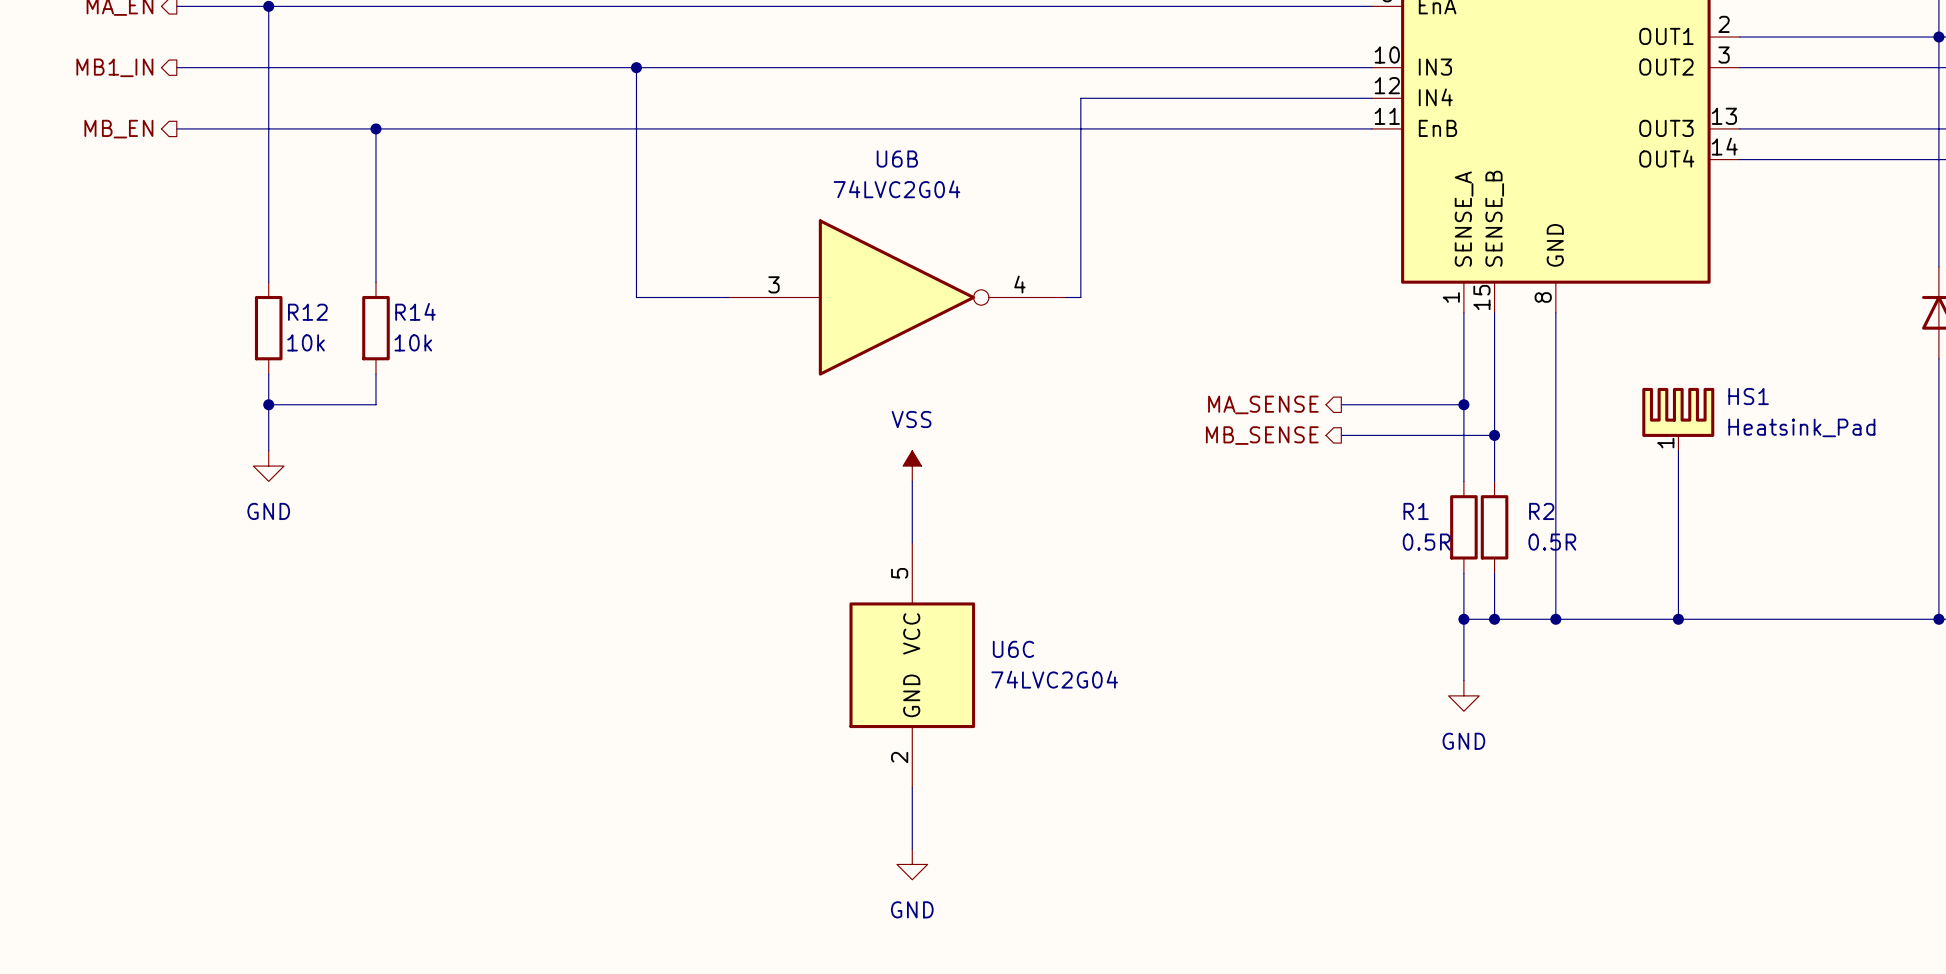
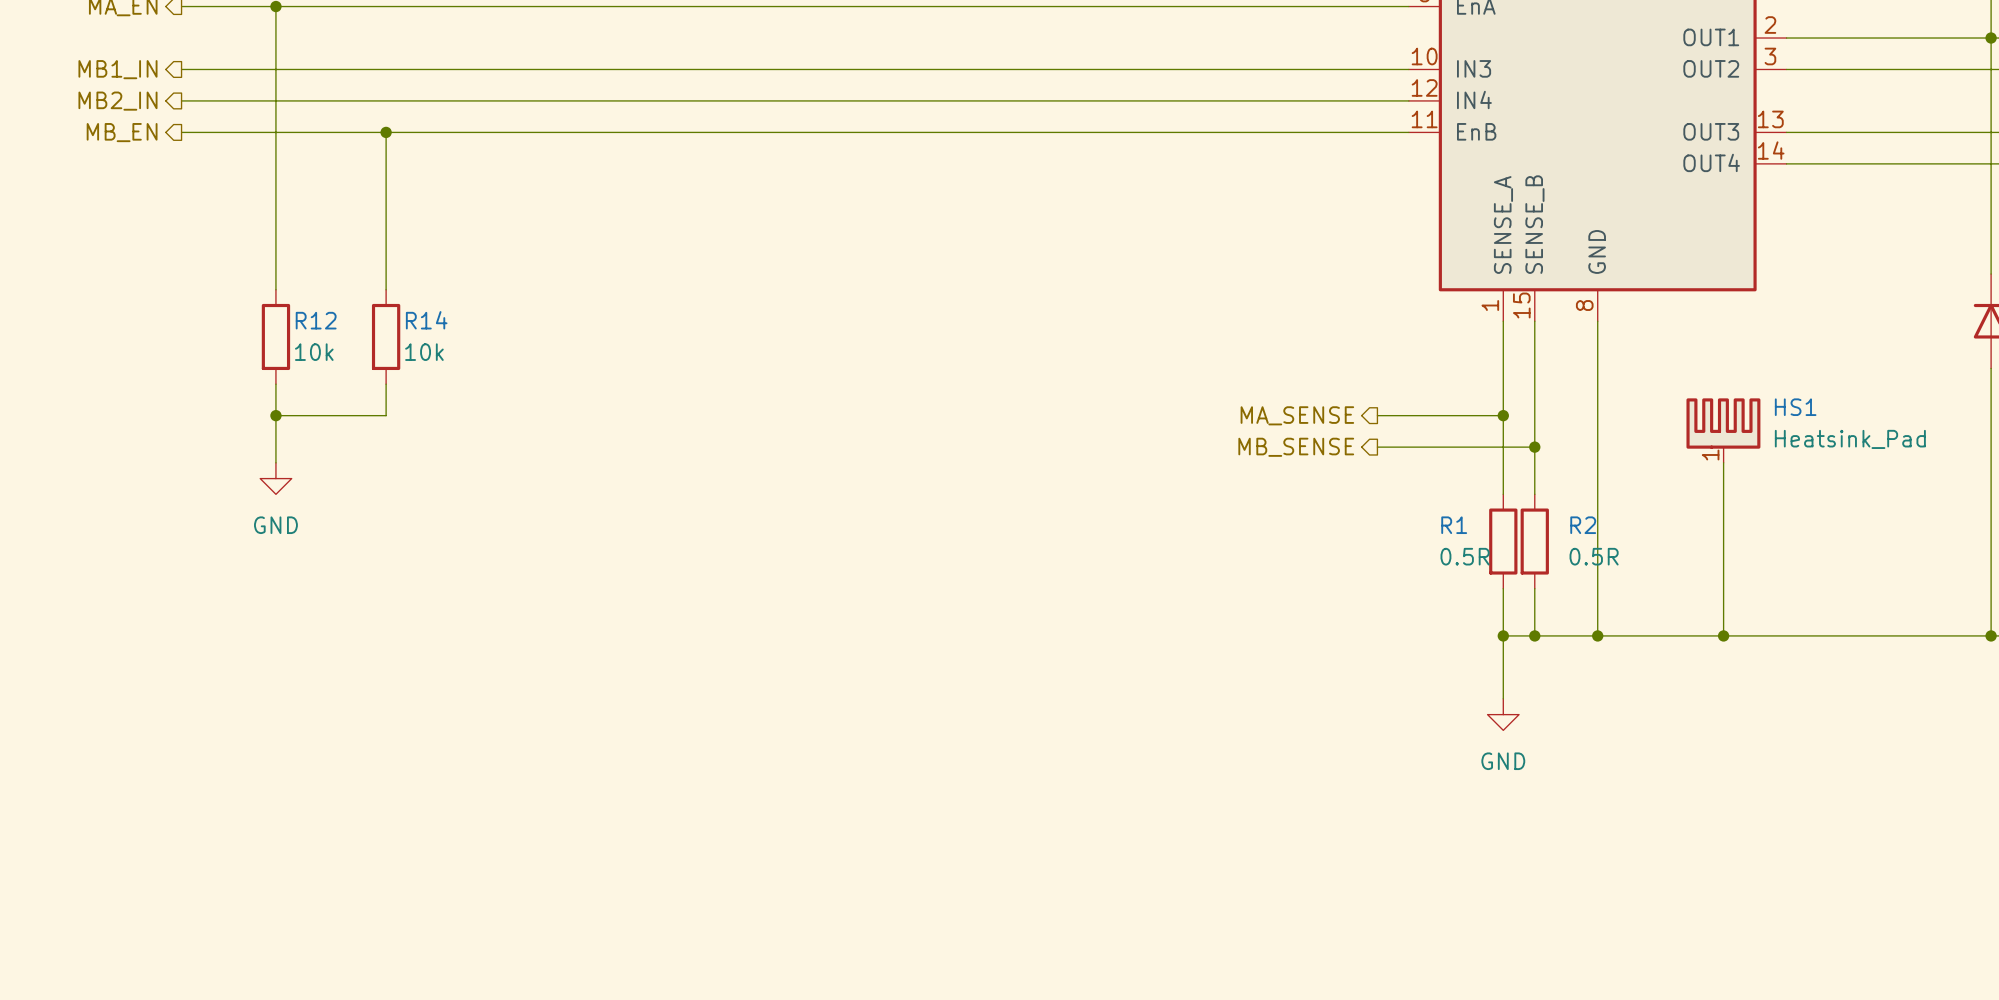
wire: (636, 67) (636, 297) (728, 297) -> none
junction: (636, 67) -> none
hierarchical label: none -> MB2_IN (117, 101)
wire: (1080, 98) (1080, 297) (1065, 297) -> (1109, 100) (181, 100)
U6B: 74LVC2G04 (896, 297) -> none
power symbol: VSS (912, 466) -> none
wire: (912, 481) (912, 542) -> none
U6C: 74LVC2G04 (912, 665) -> none
wire: (912, 787) (912, 849) -> none
power symbol: GND (912, 864) -> none

